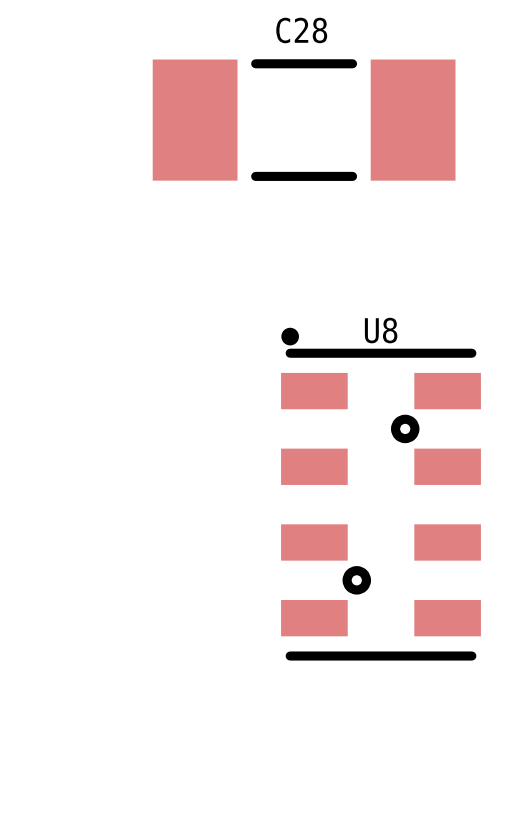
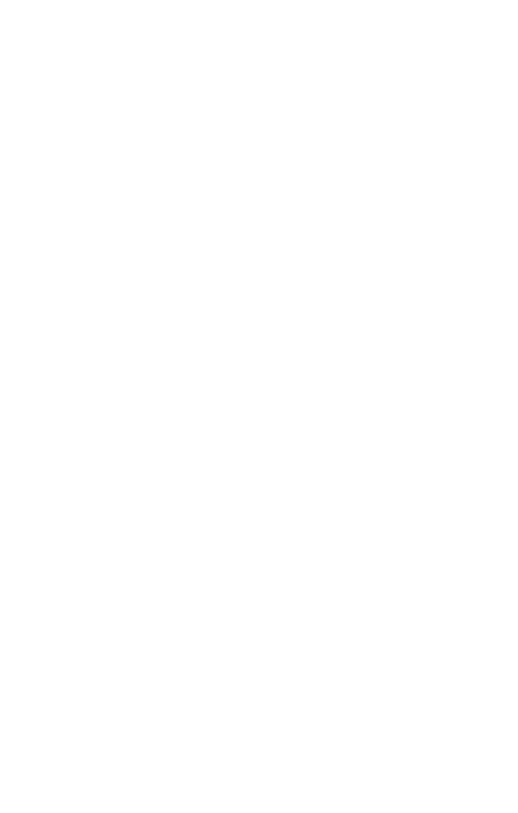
C28: (304, 120) -> none
U8: (381, 494) -> none

